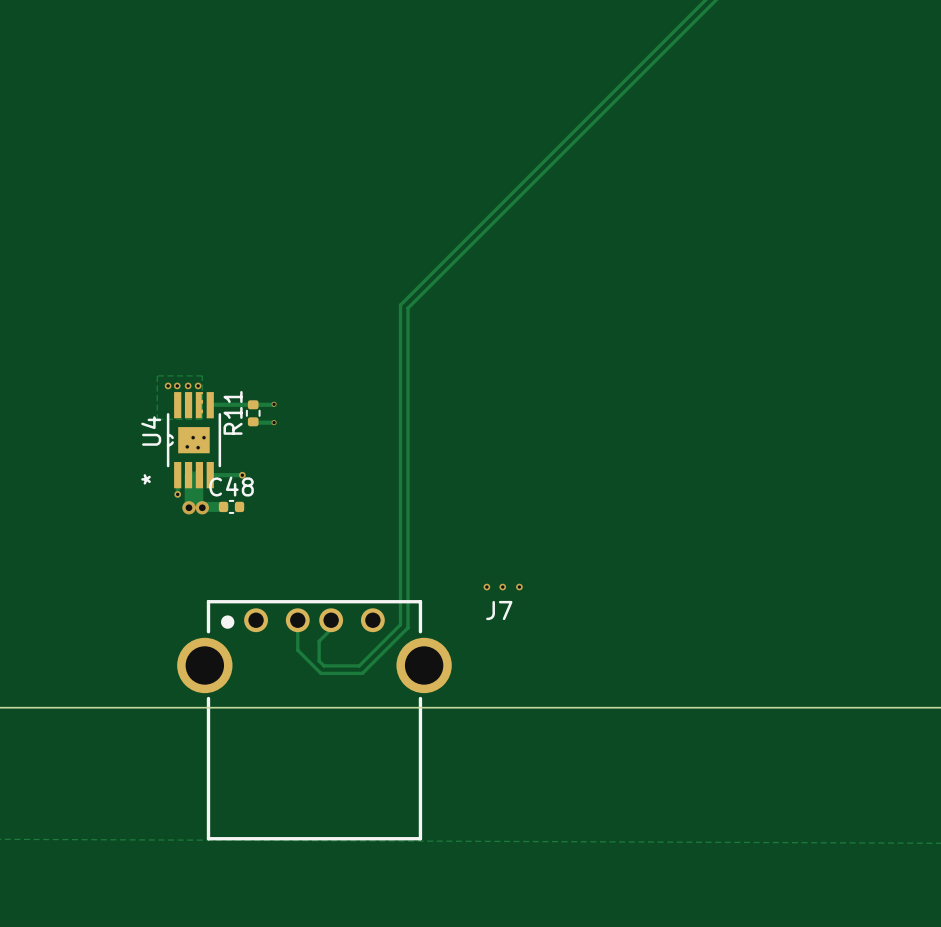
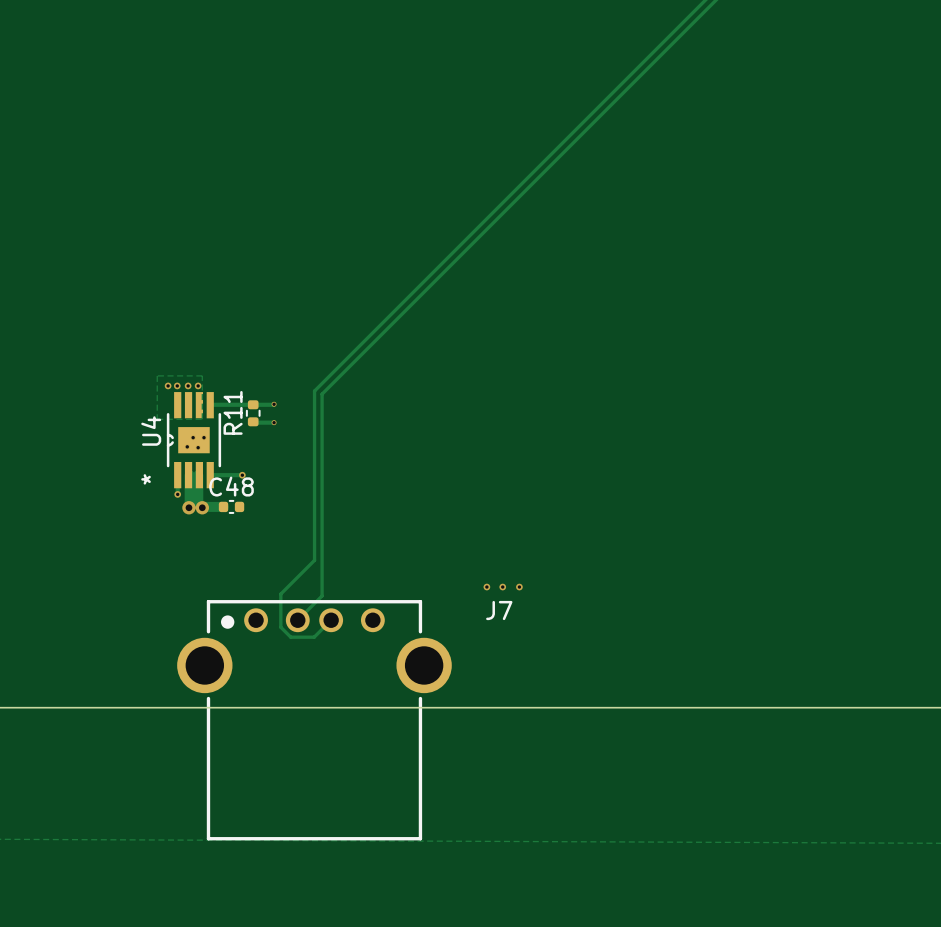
track: (400, 305) (400, 624) (359, 665) (324, 665) (319, 661) (319, 641) (331, 629) (331, 620) -> (400, 305) (314, 391) (314, 560) (280, 594) (280, 627) (290, 637) (314, 637) (331, 620)
track: (408, 308) (408, 627) (362, 673) (320, 673) (297, 650) (297, 620) -> (408, 308) (322, 394) (322, 595) (297, 620)

